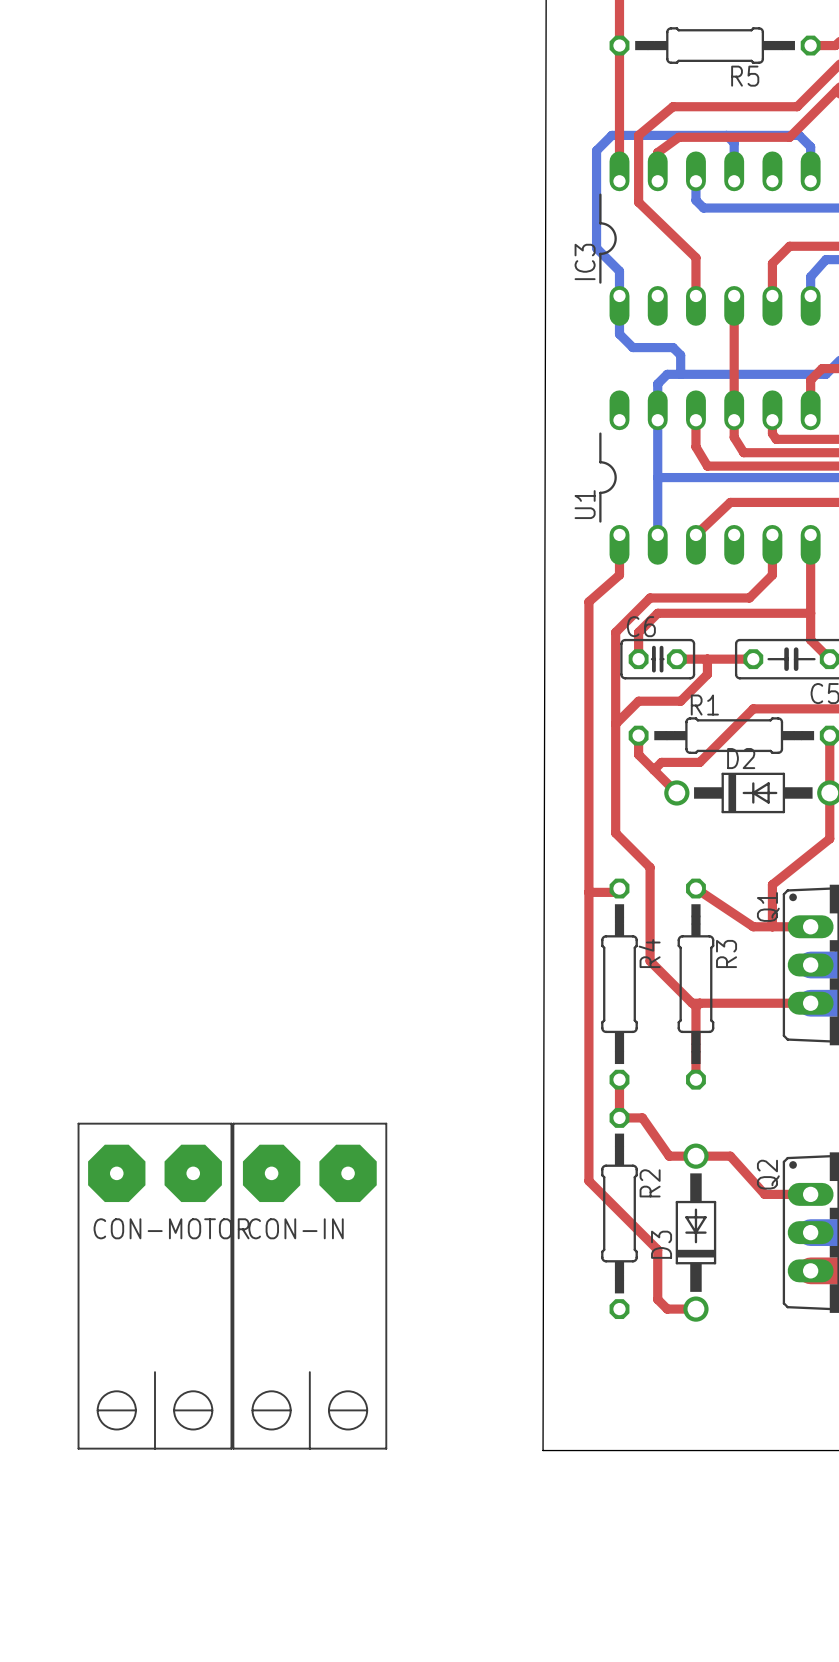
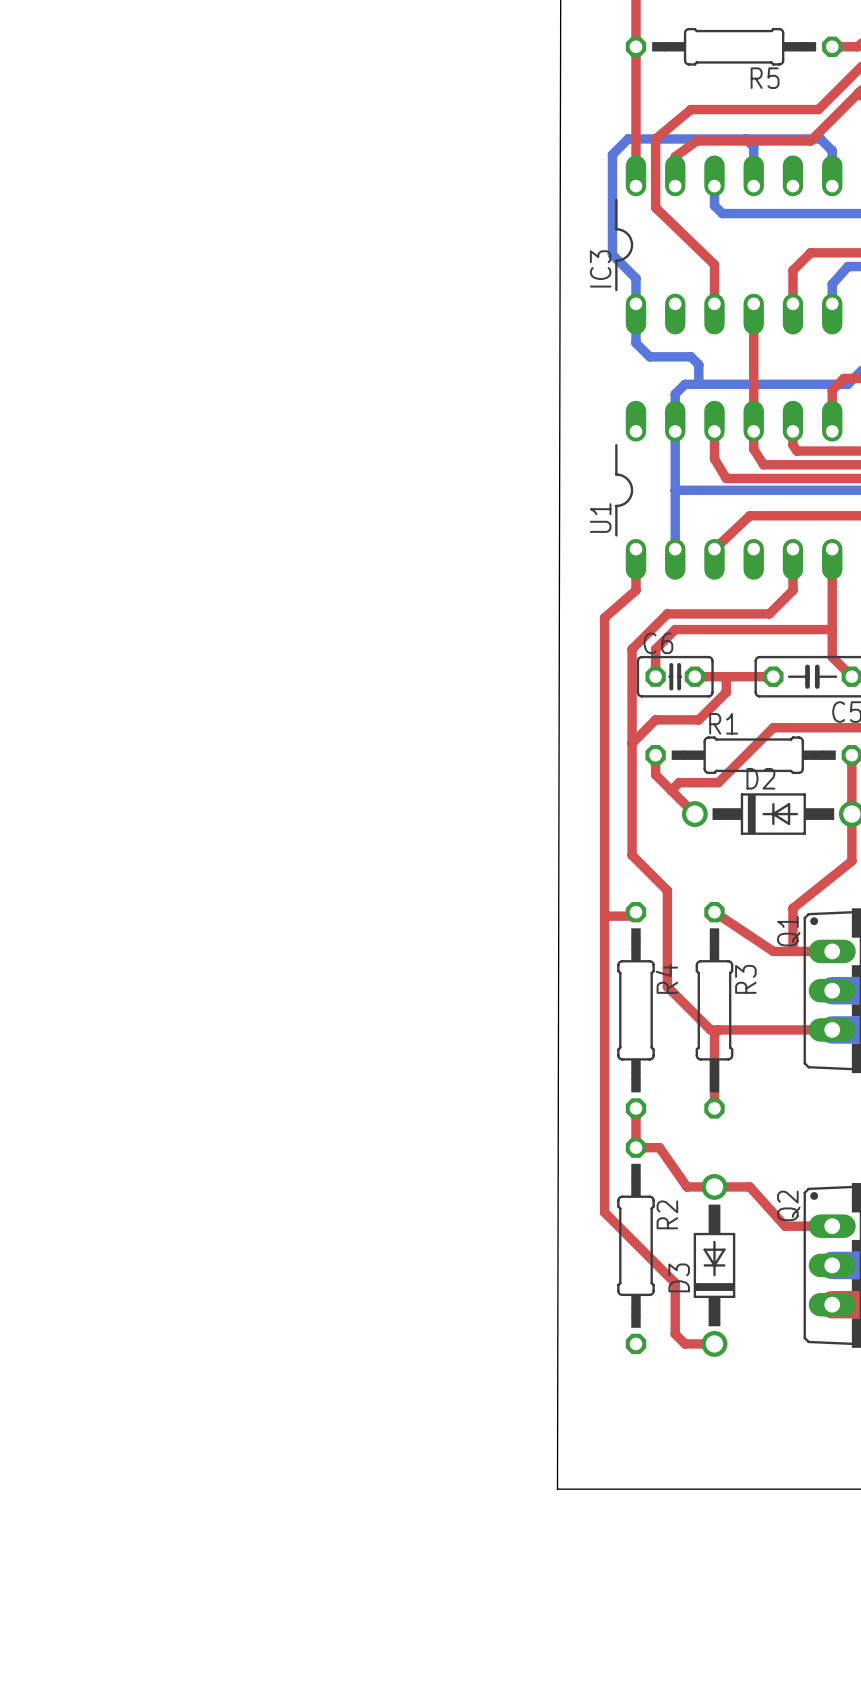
CON-MOTOR: (154, 1286) -> none
CON-IN: (309, 1286) -> none

